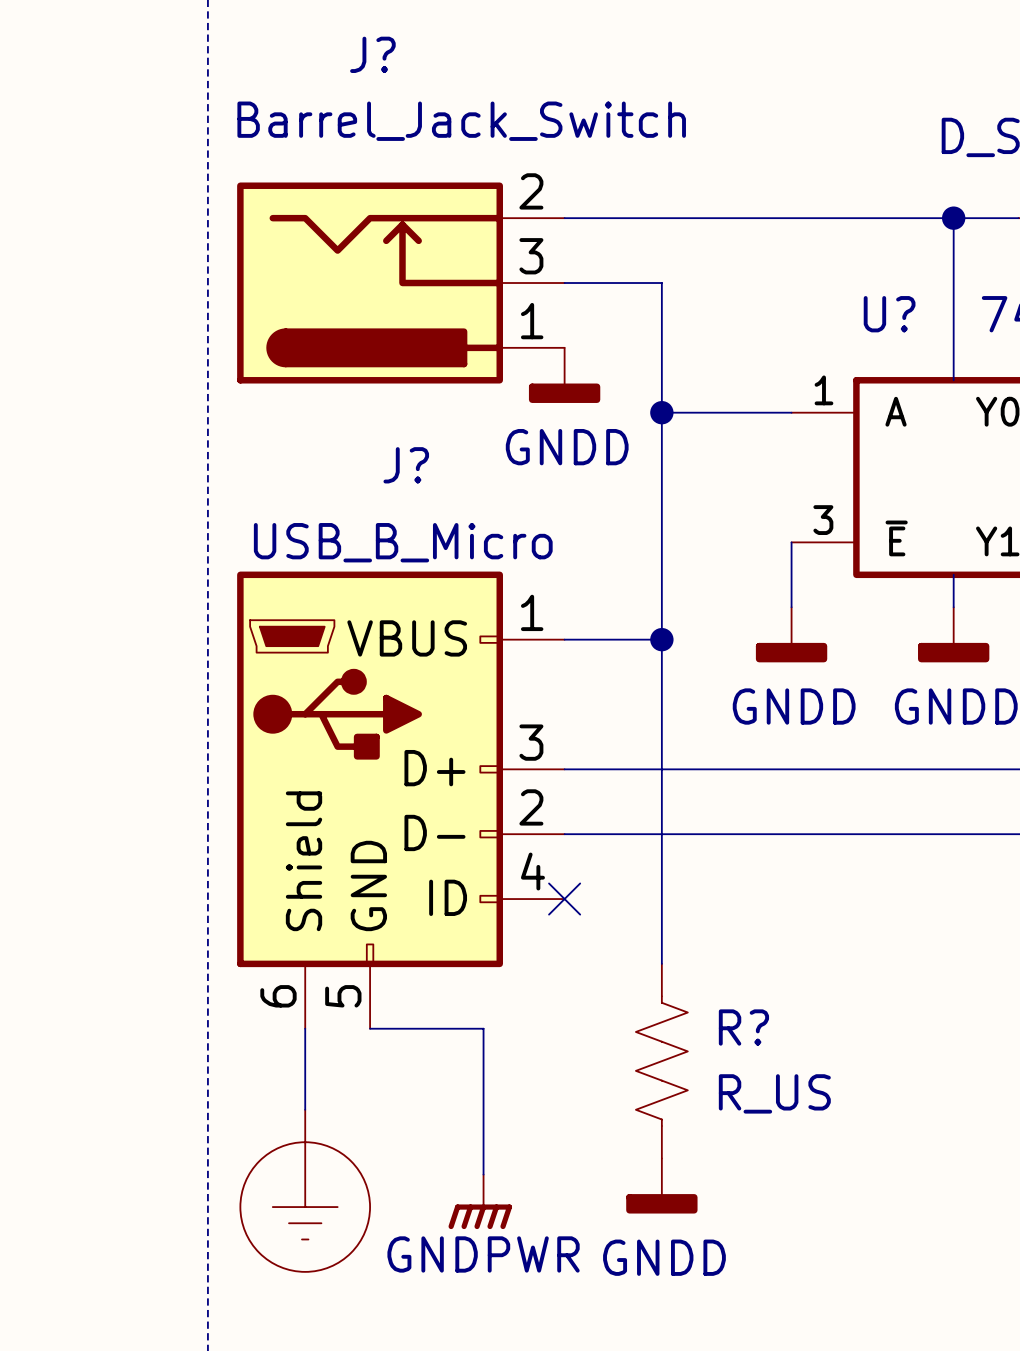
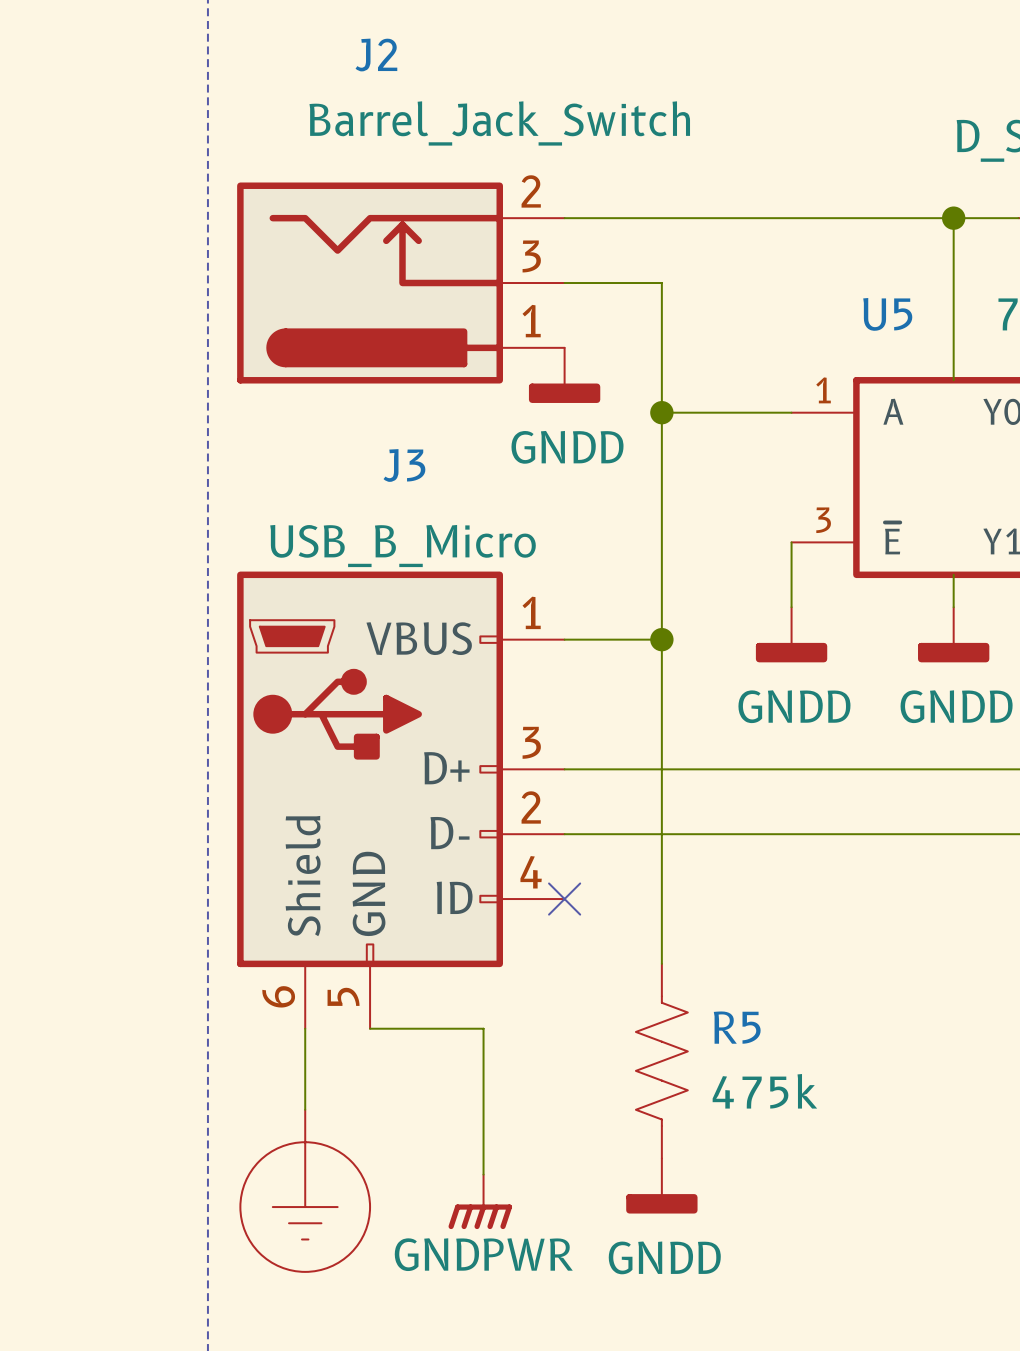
J? name: J? (372, 54) -> J2 (376, 55)
U? name: U? (889, 314) -> U5 (887, 314)
J? name: J? (406, 465) -> J3 (404, 465)
R? name: R? (743, 1027) -> R5 (737, 1027)
R? value: R_US (774, 1093) -> 475k (764, 1091)

